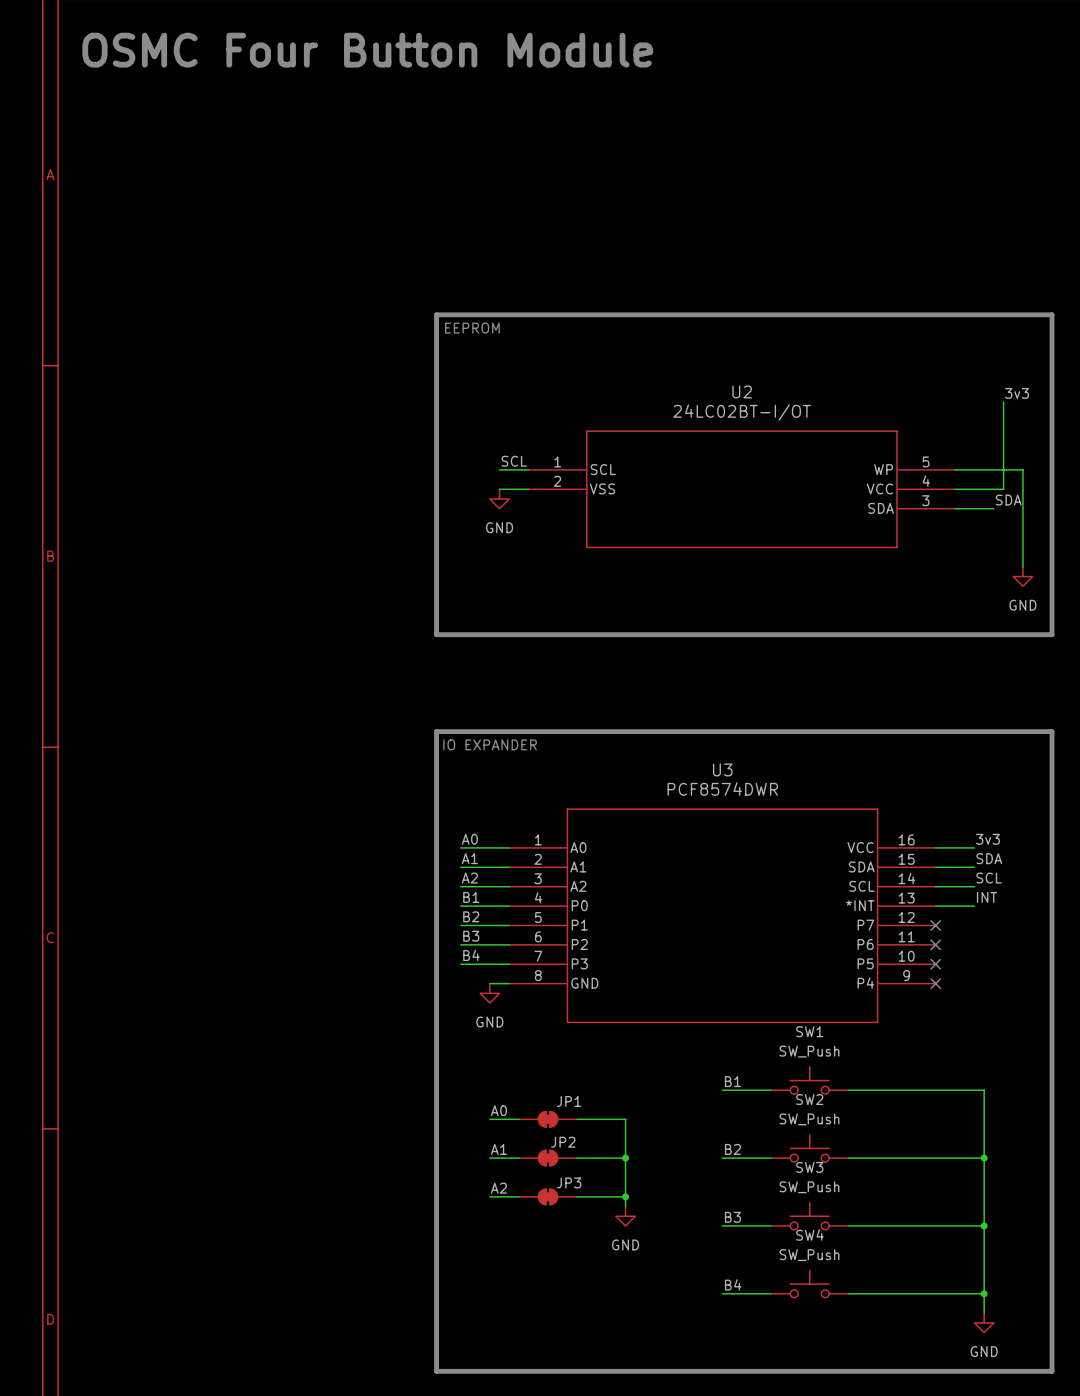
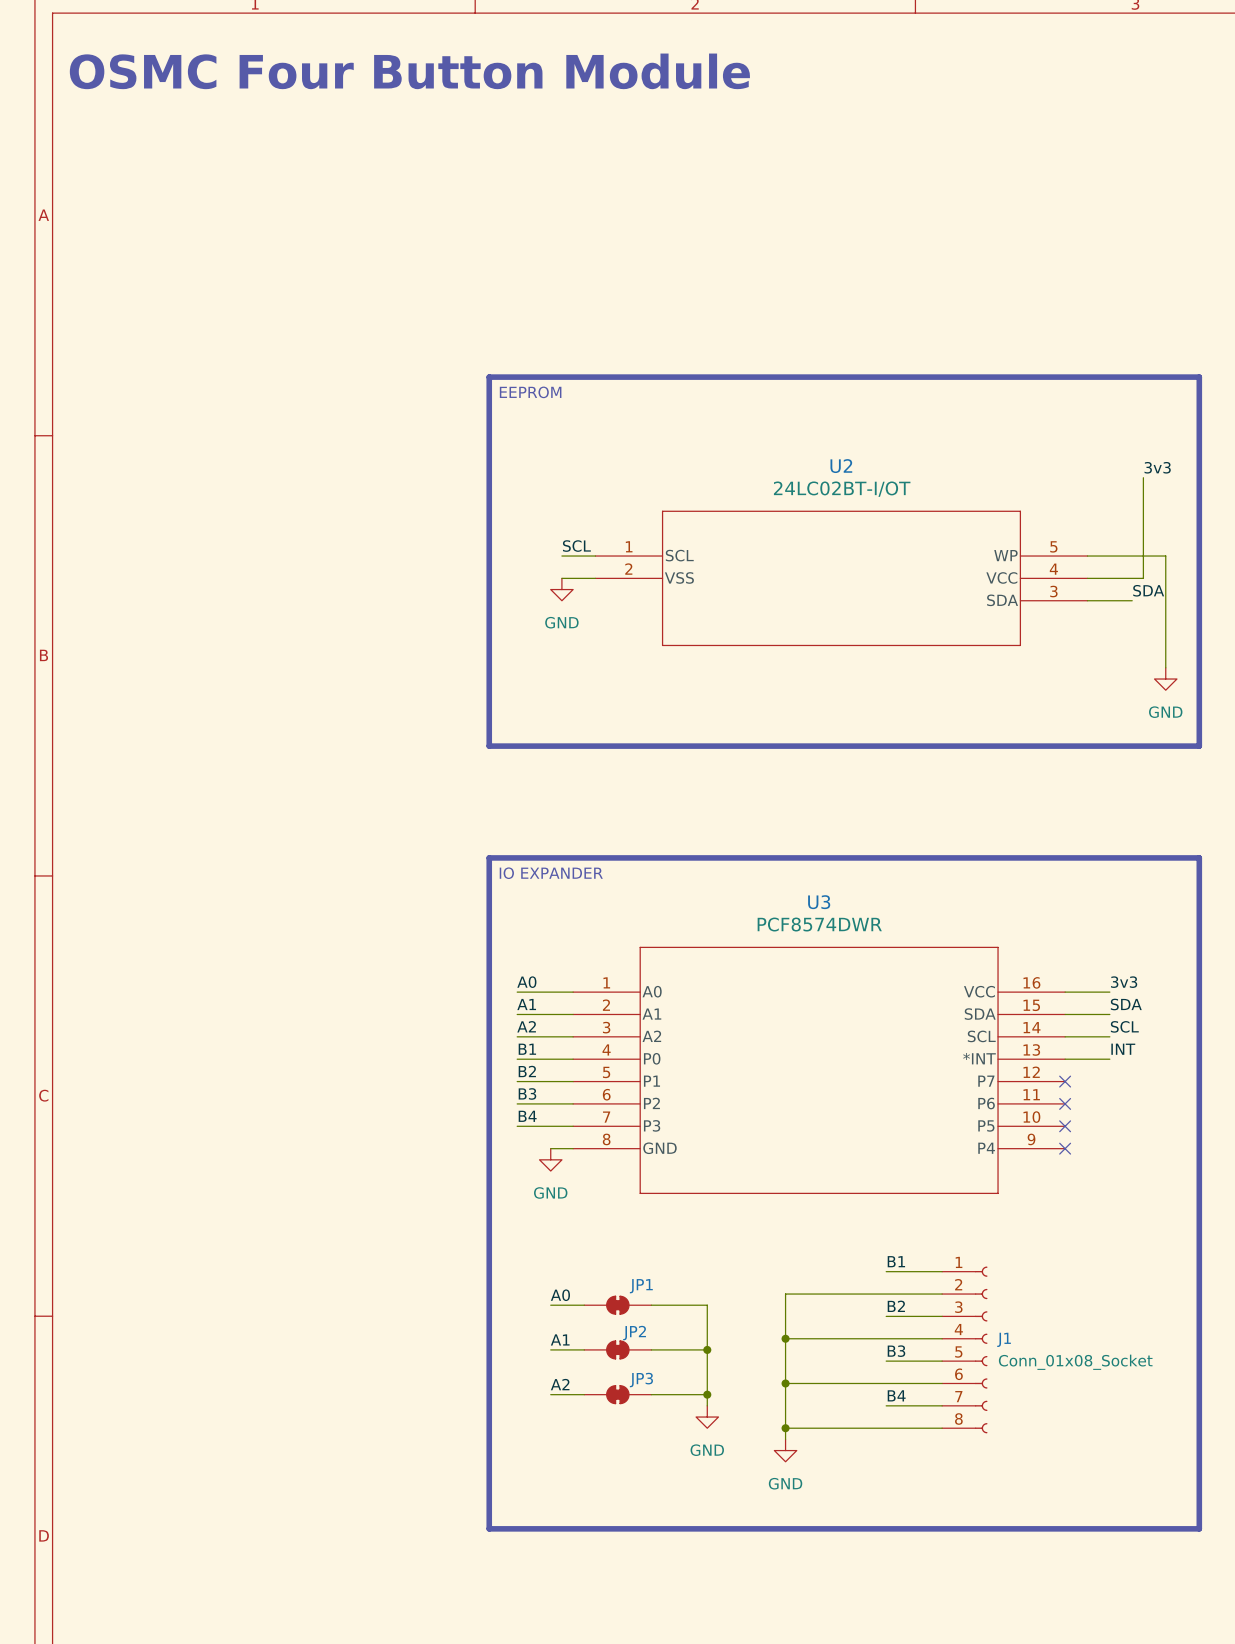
SW1: SW_Push (809, 1080) -> none
label position: B1 (732, 1081) -> B1 (896, 1261)
wire: (722, 1090) (770, 1090) -> (886, 1271) (942, 1271)
wire: (848, 1090) (984, 1090) (984, 1313) -> none
wire: none -> (942, 1294) (785, 1294) (785, 1439)
wire: none -> (886, 1316) (942, 1316)
junction: none -> (785, 1338)
SW2: SW_Push (809, 1148) -> none
label position: B2 (732, 1149) -> B2 (896, 1306)
wire: (722, 1158) (770, 1158) -> (886, 1361) (942, 1361)
wire: (848, 1158) (984, 1158) -> (785, 1338) (942, 1338)
J1: none -> Conn_01x08_Socket (964, 1349)
junction: (984, 1158) -> none
junction: none -> (785, 1383)
SW3: SW_Push (809, 1216) -> none
label position: B3 (732, 1217) -> B3 (896, 1351)
wire: none -> (785, 1428) (819, 1428)
junction: none -> (785, 1428)
wire: none -> (875, 1428) (942, 1428)
wire: (848, 1225) (984, 1225) -> (785, 1383) (942, 1383)
junction: (984, 1225) -> none
power symbol: none -> GND (785, 1450)
label position: B4 (733, 1284) -> B4 (896, 1395)
SW4: SW_Push (809, 1284) -> none
wire: (722, 1293) (770, 1293) -> (886, 1405) (942, 1405)
wire: (848, 1293) (984, 1293) -> none
junction: (984, 1293) -> none
line: (436, 1313) (436, 1371) (1052, 1371) (1052, 1313) -> (489, 1528) (1199, 1528)
power symbol: GND (984, 1322) -> none

